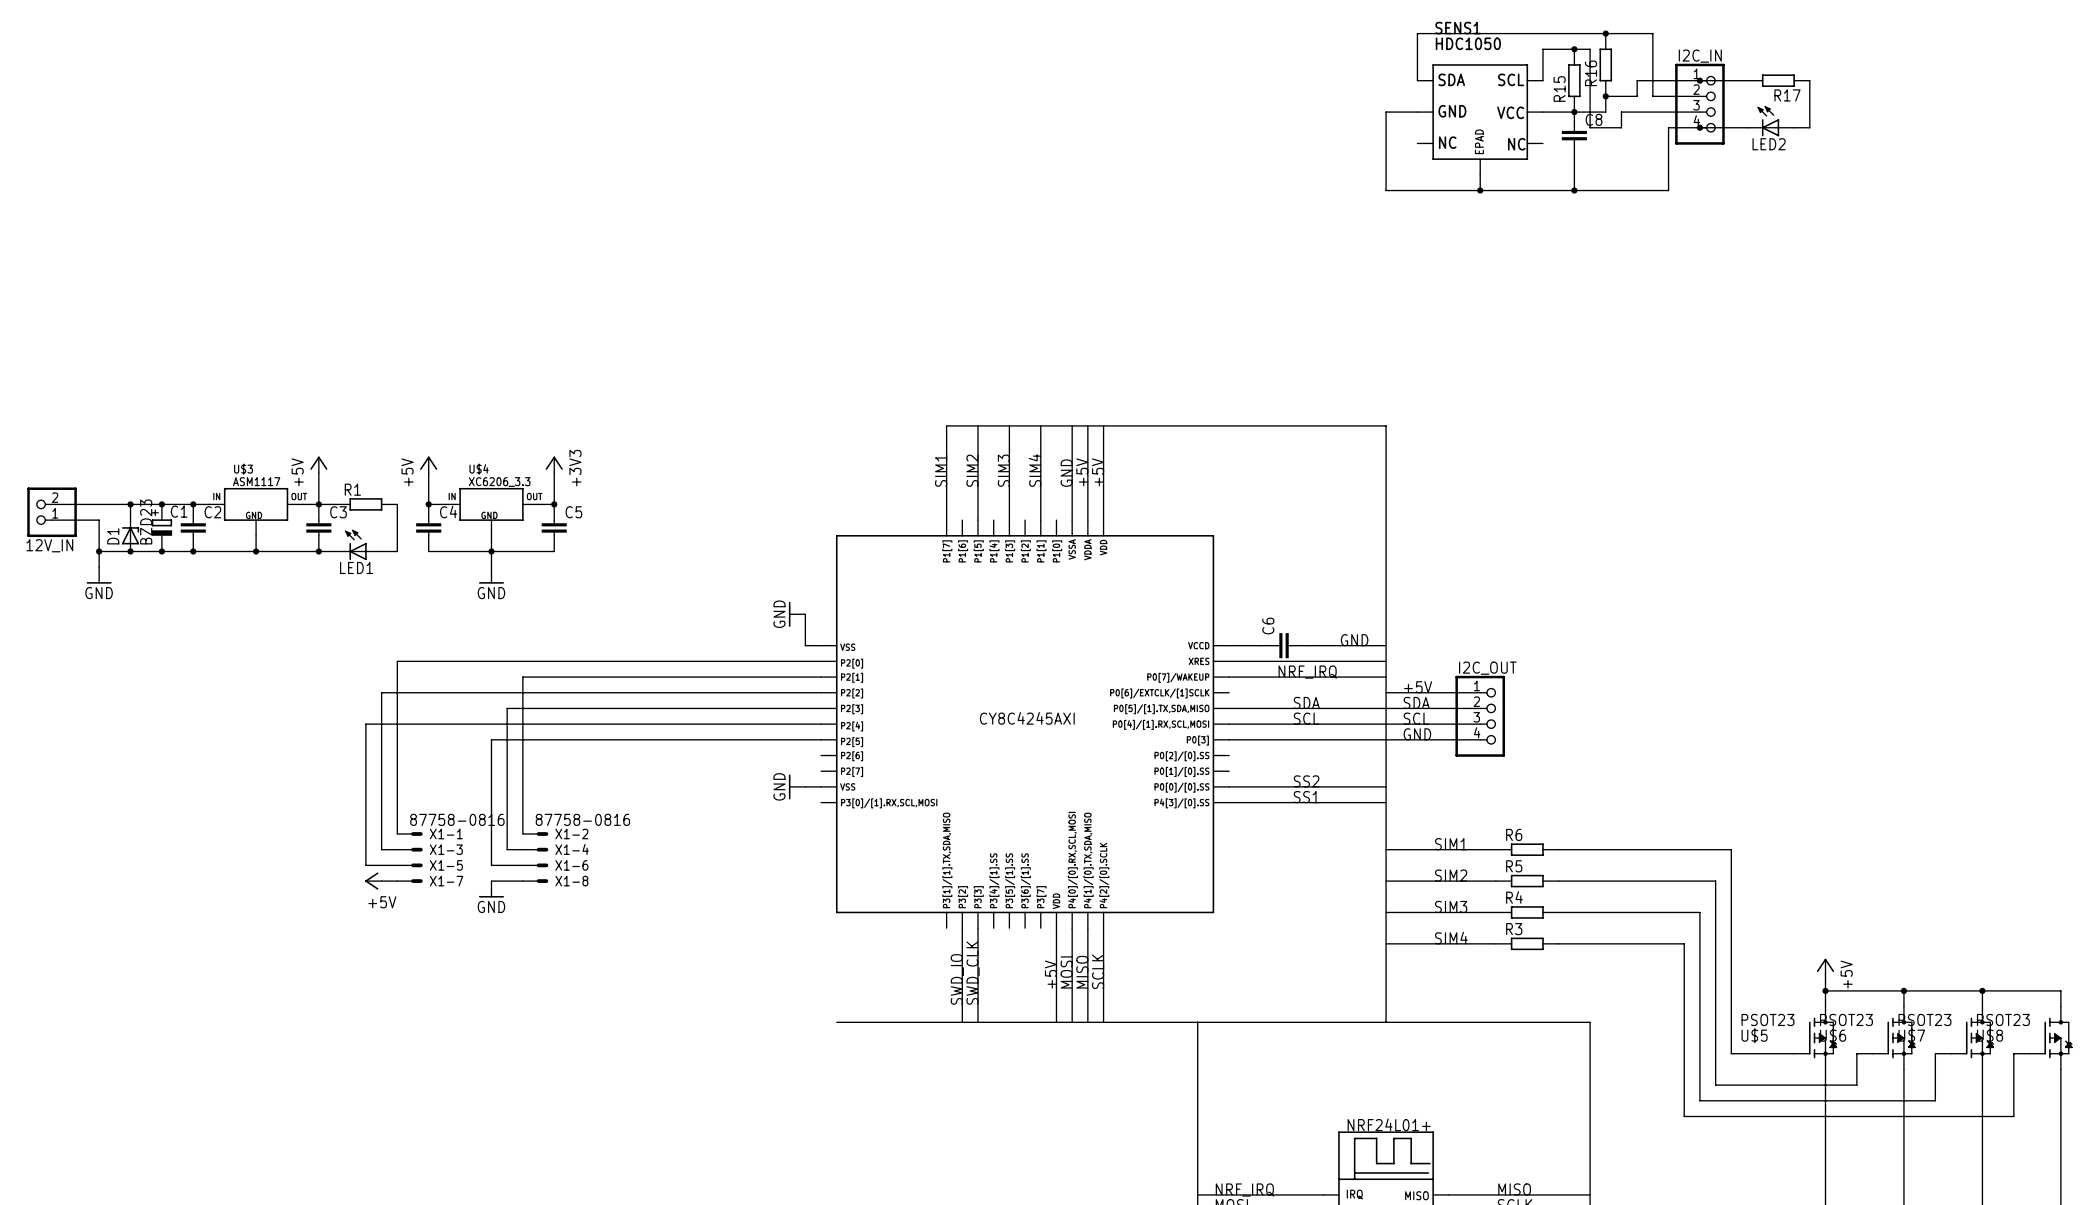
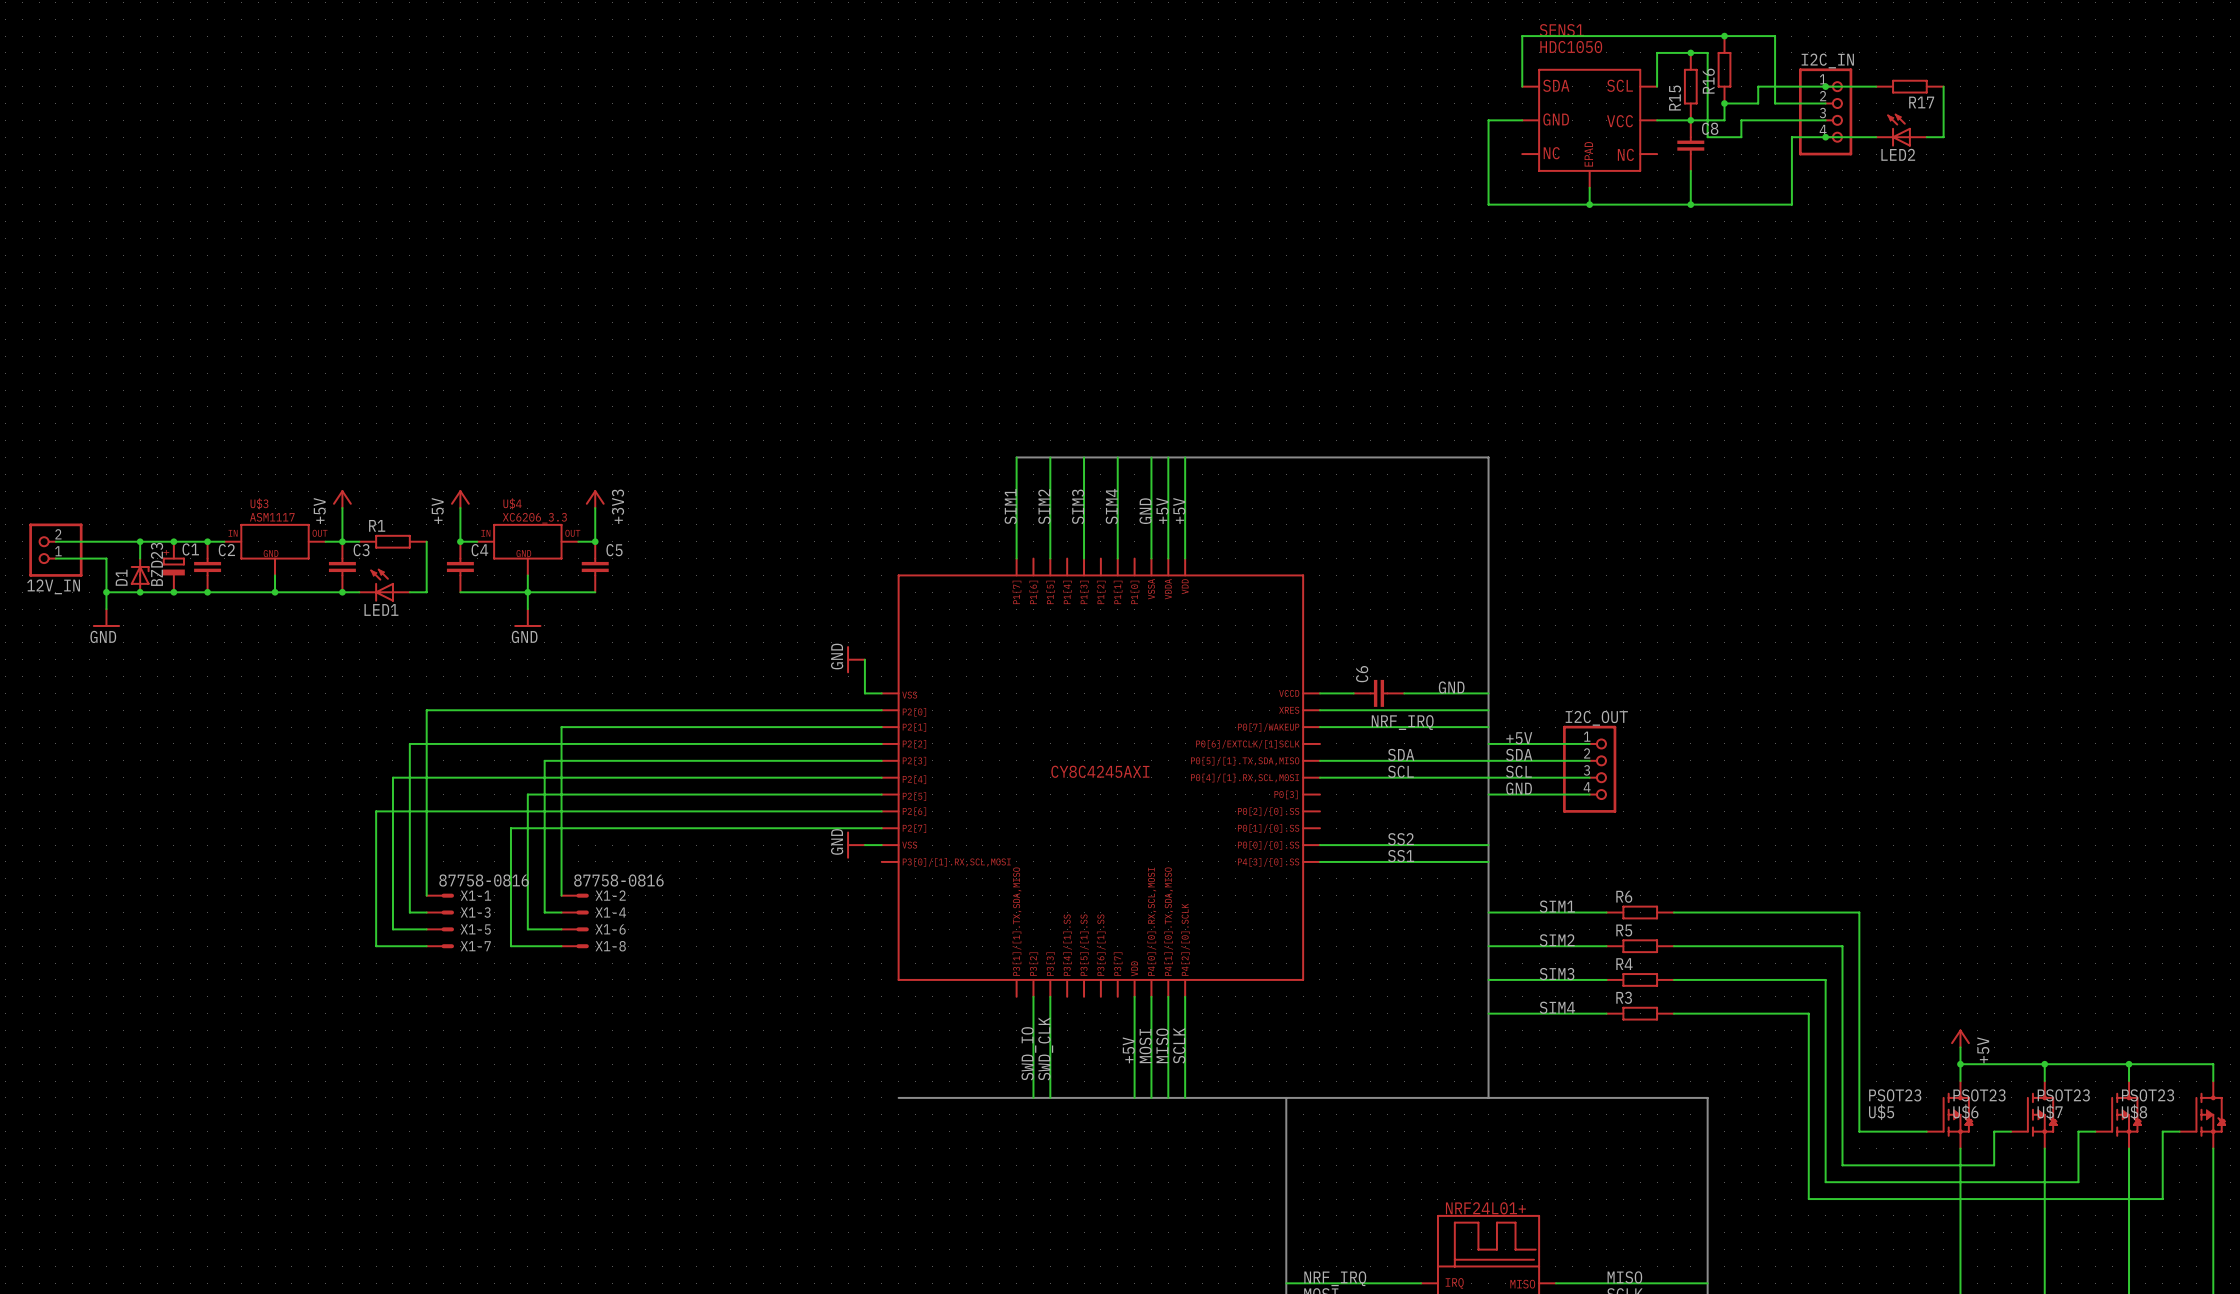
wire: (1229, 739) (1386, 739) -> none
wire: none -> (881, 811) (376, 811) (376, 946) (409, 946)
wire: none -> (881, 828) (510, 828) (510, 946) (527, 946)
power symbol: +5V (373, 881) -> none
power symbol: GND (491, 889) -> none

